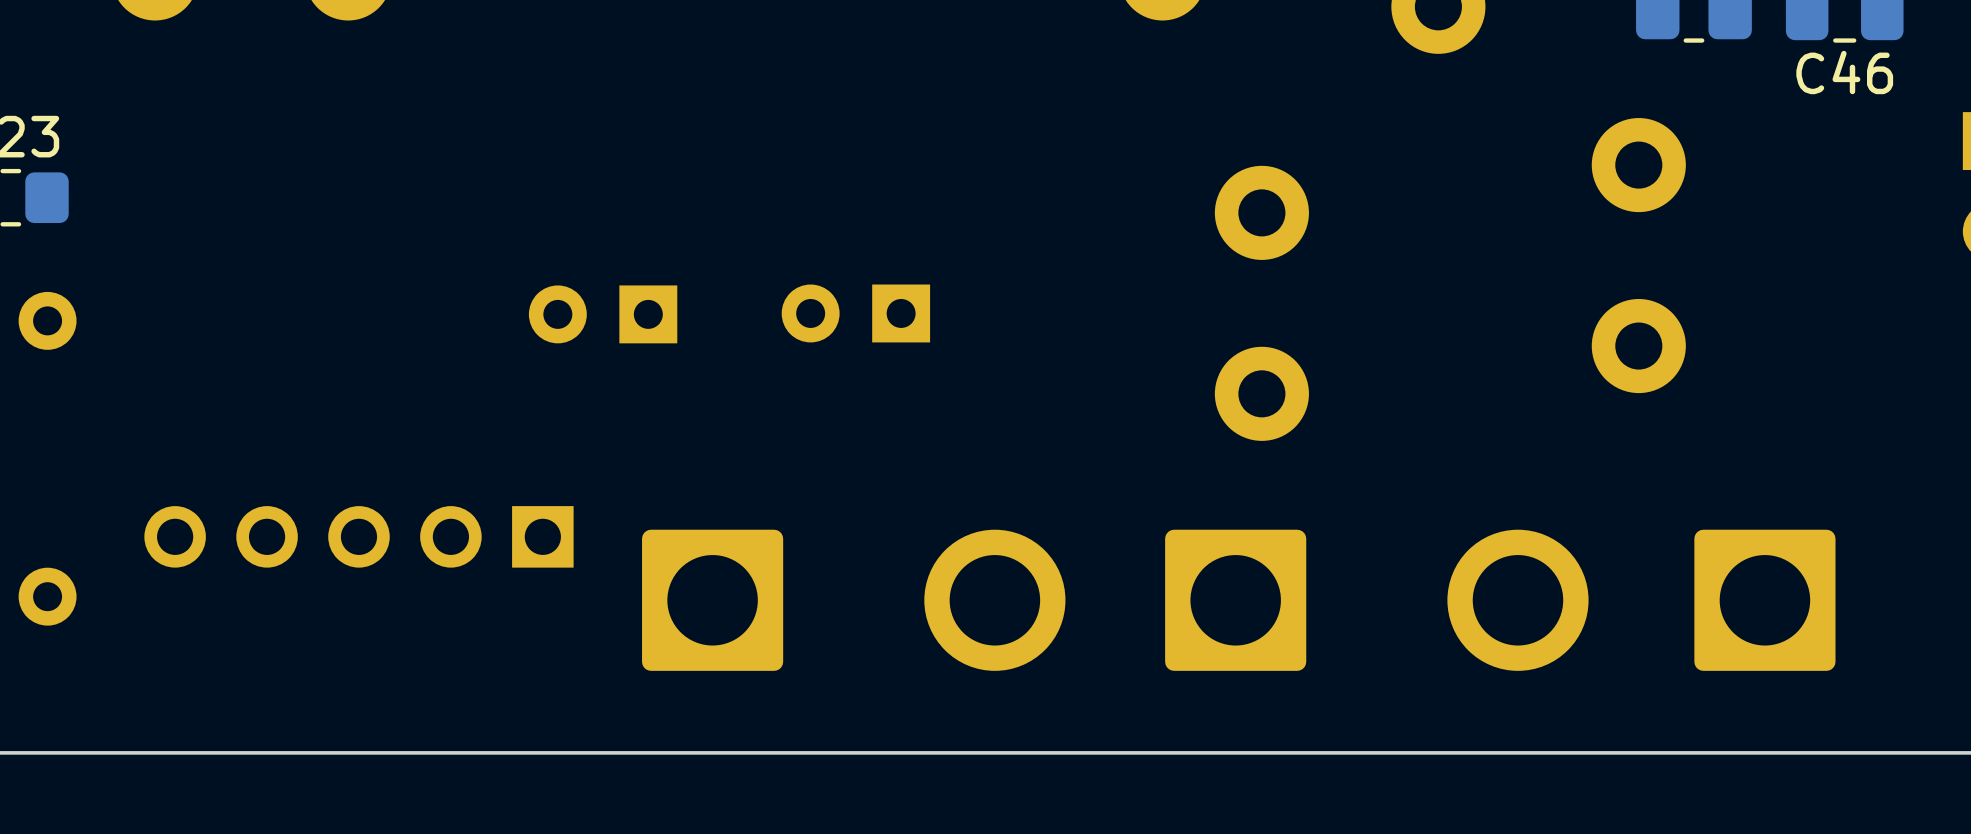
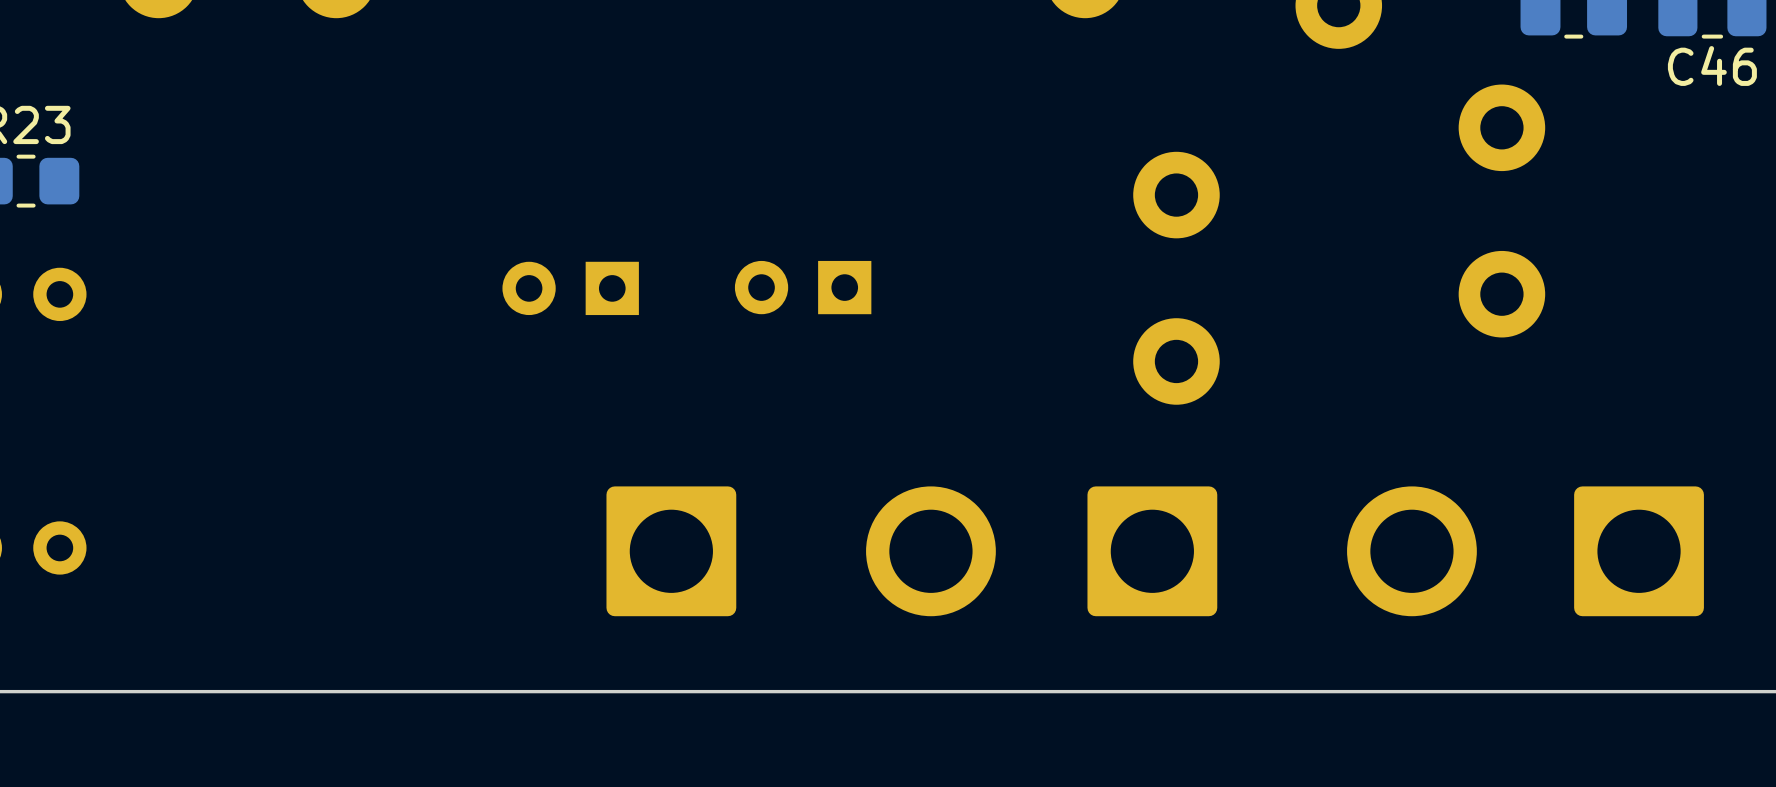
part position: (1638, 255) -> (1501, 211)
part: (358, 536) -> none

